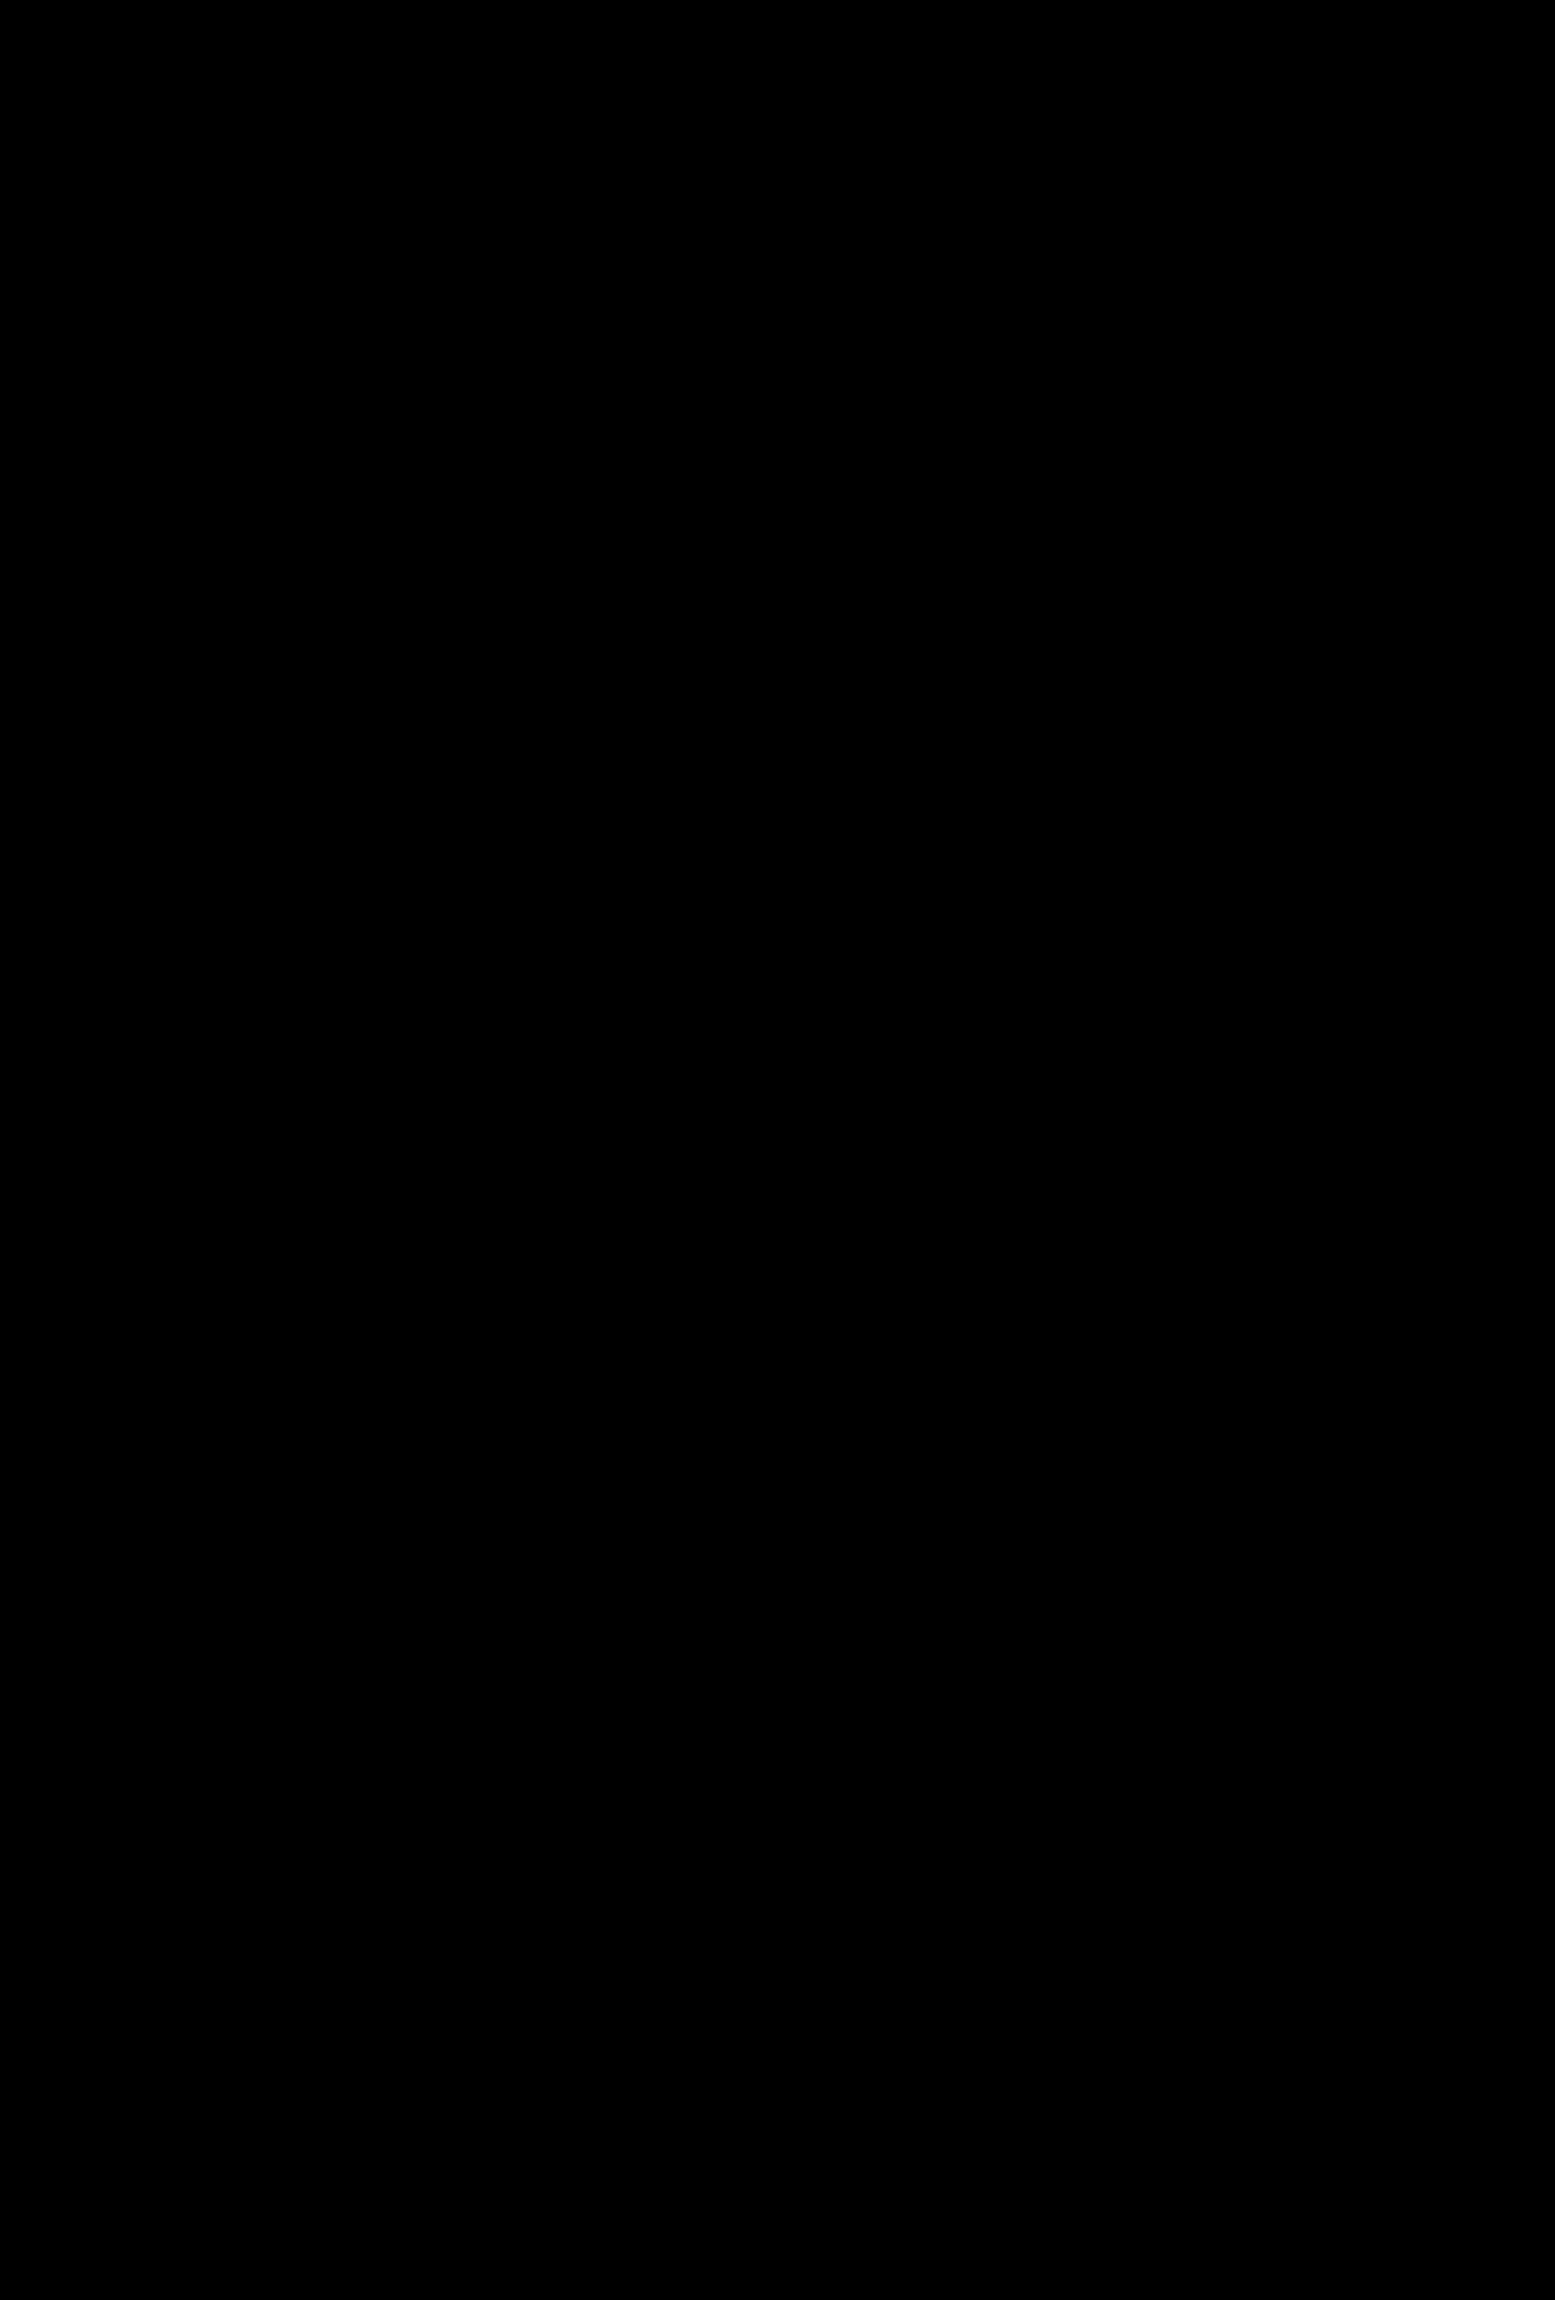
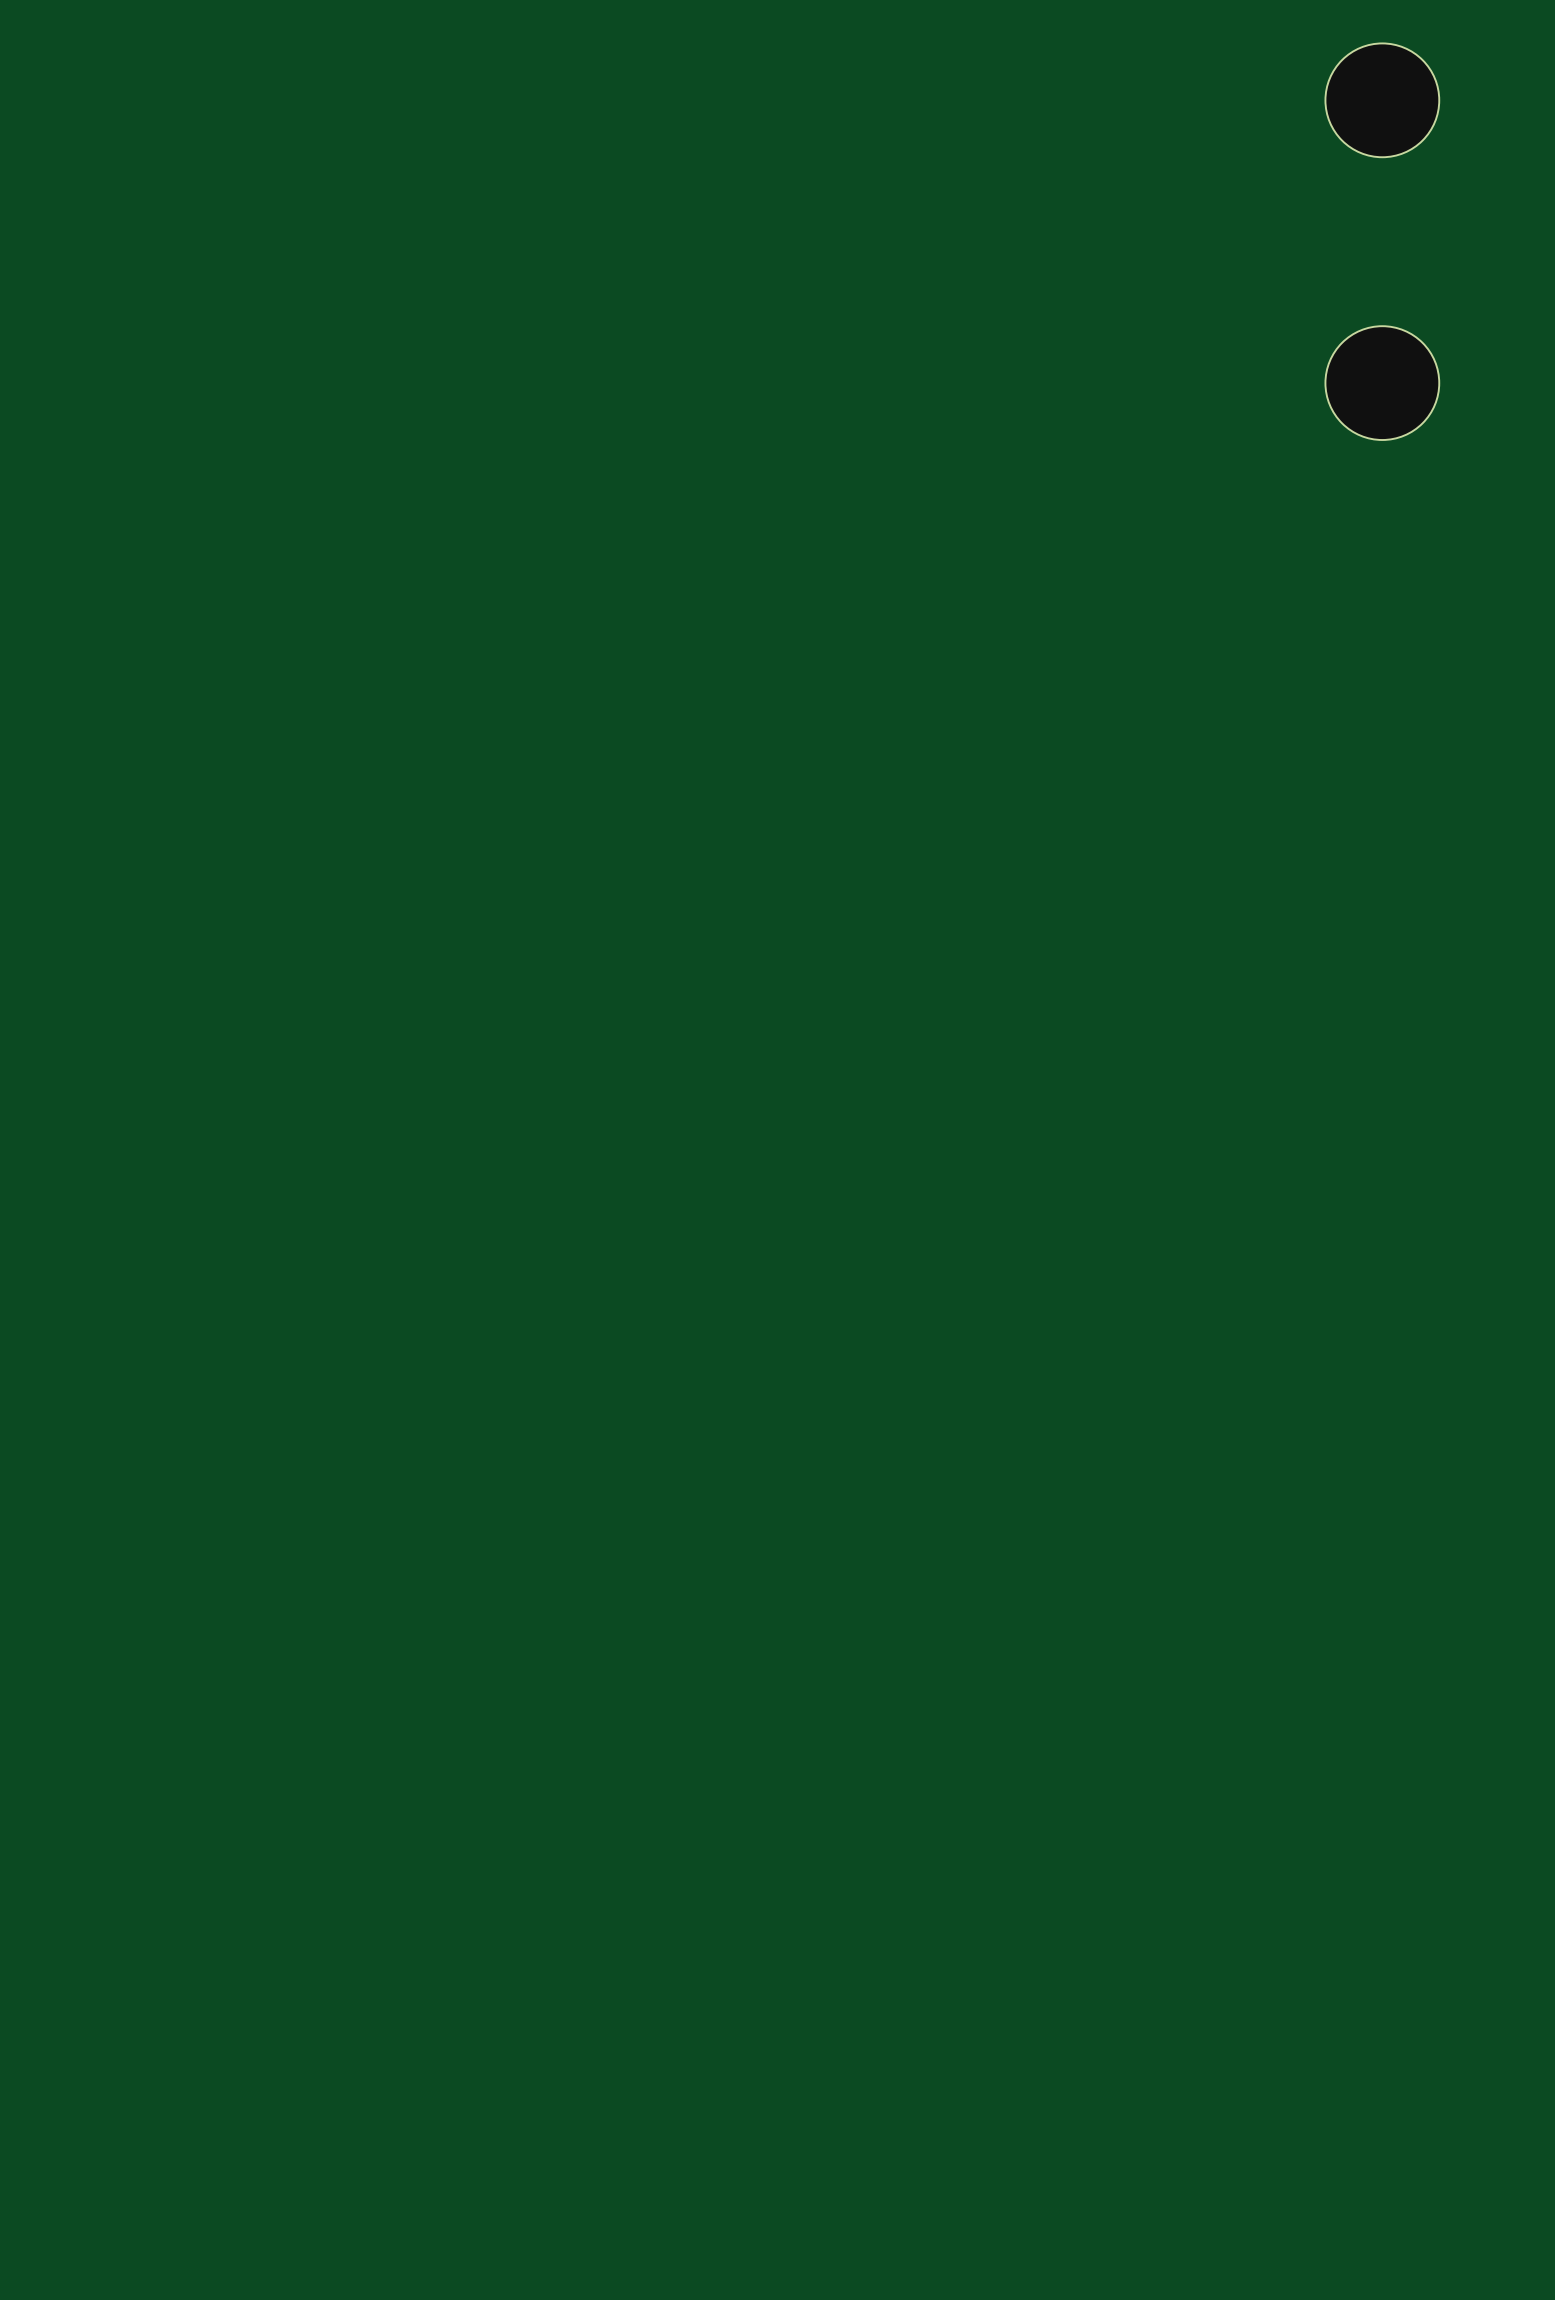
part: none -> (1382, 100)
part: none -> (1382, 383)

